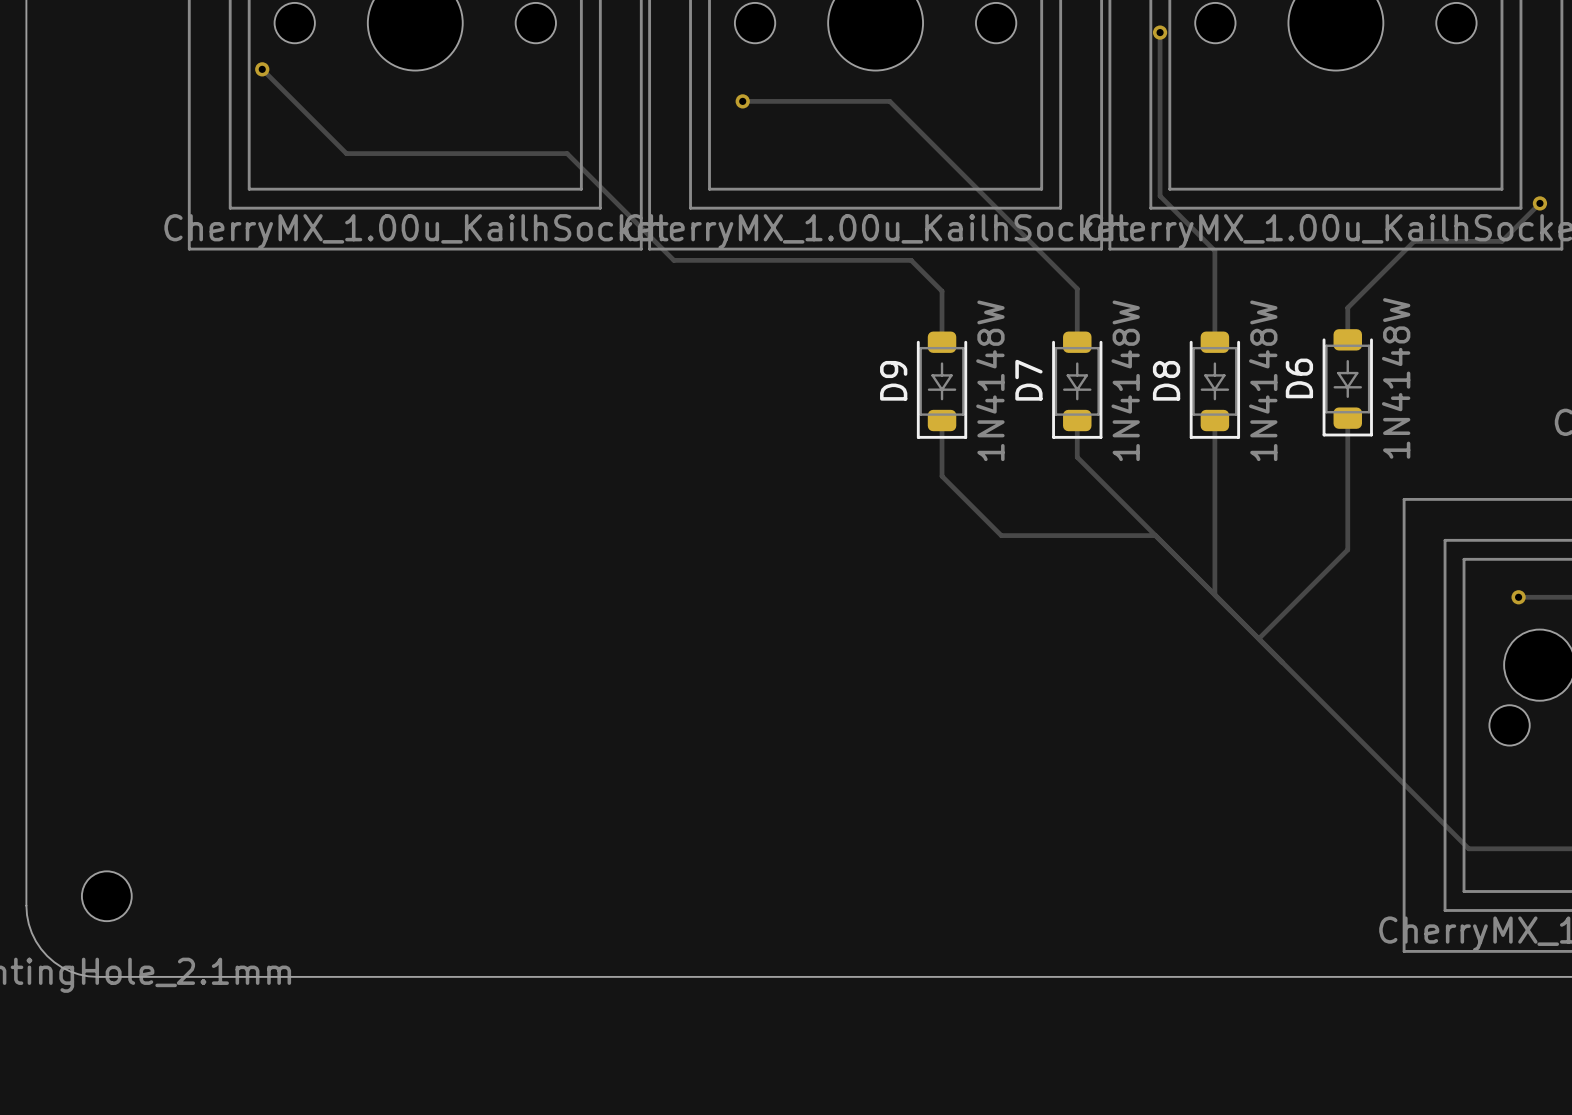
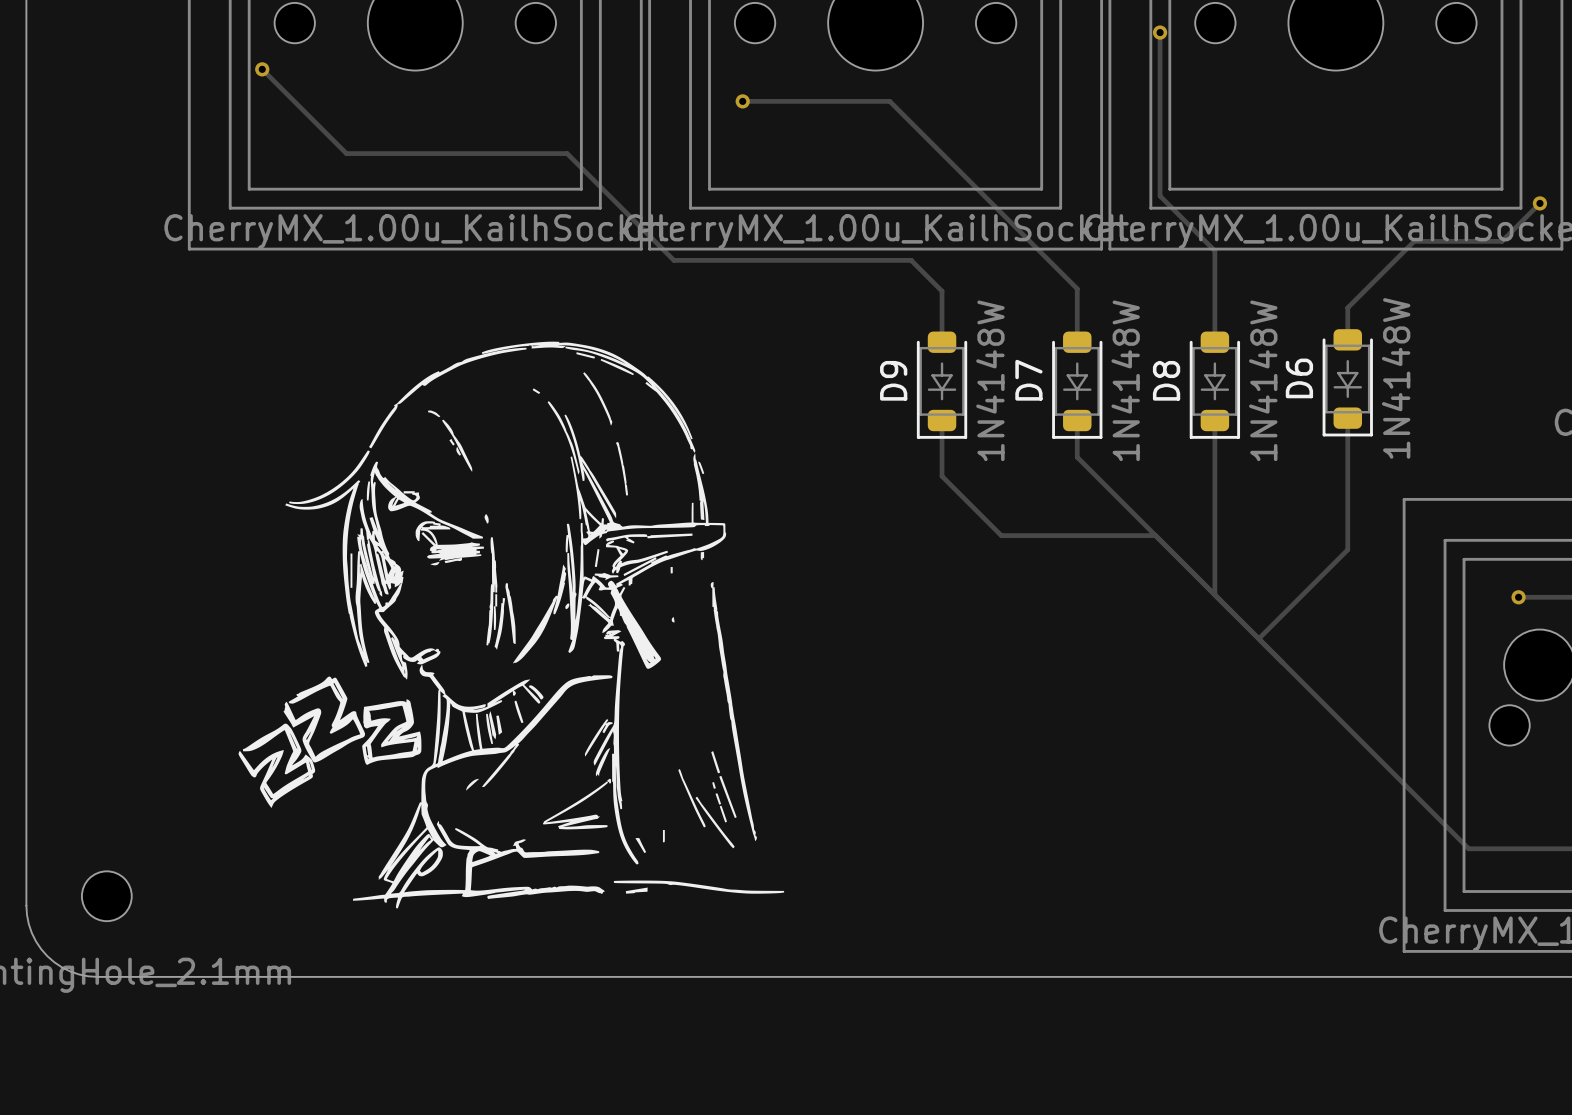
drawing: none -> [238, 341, 785, 909]

